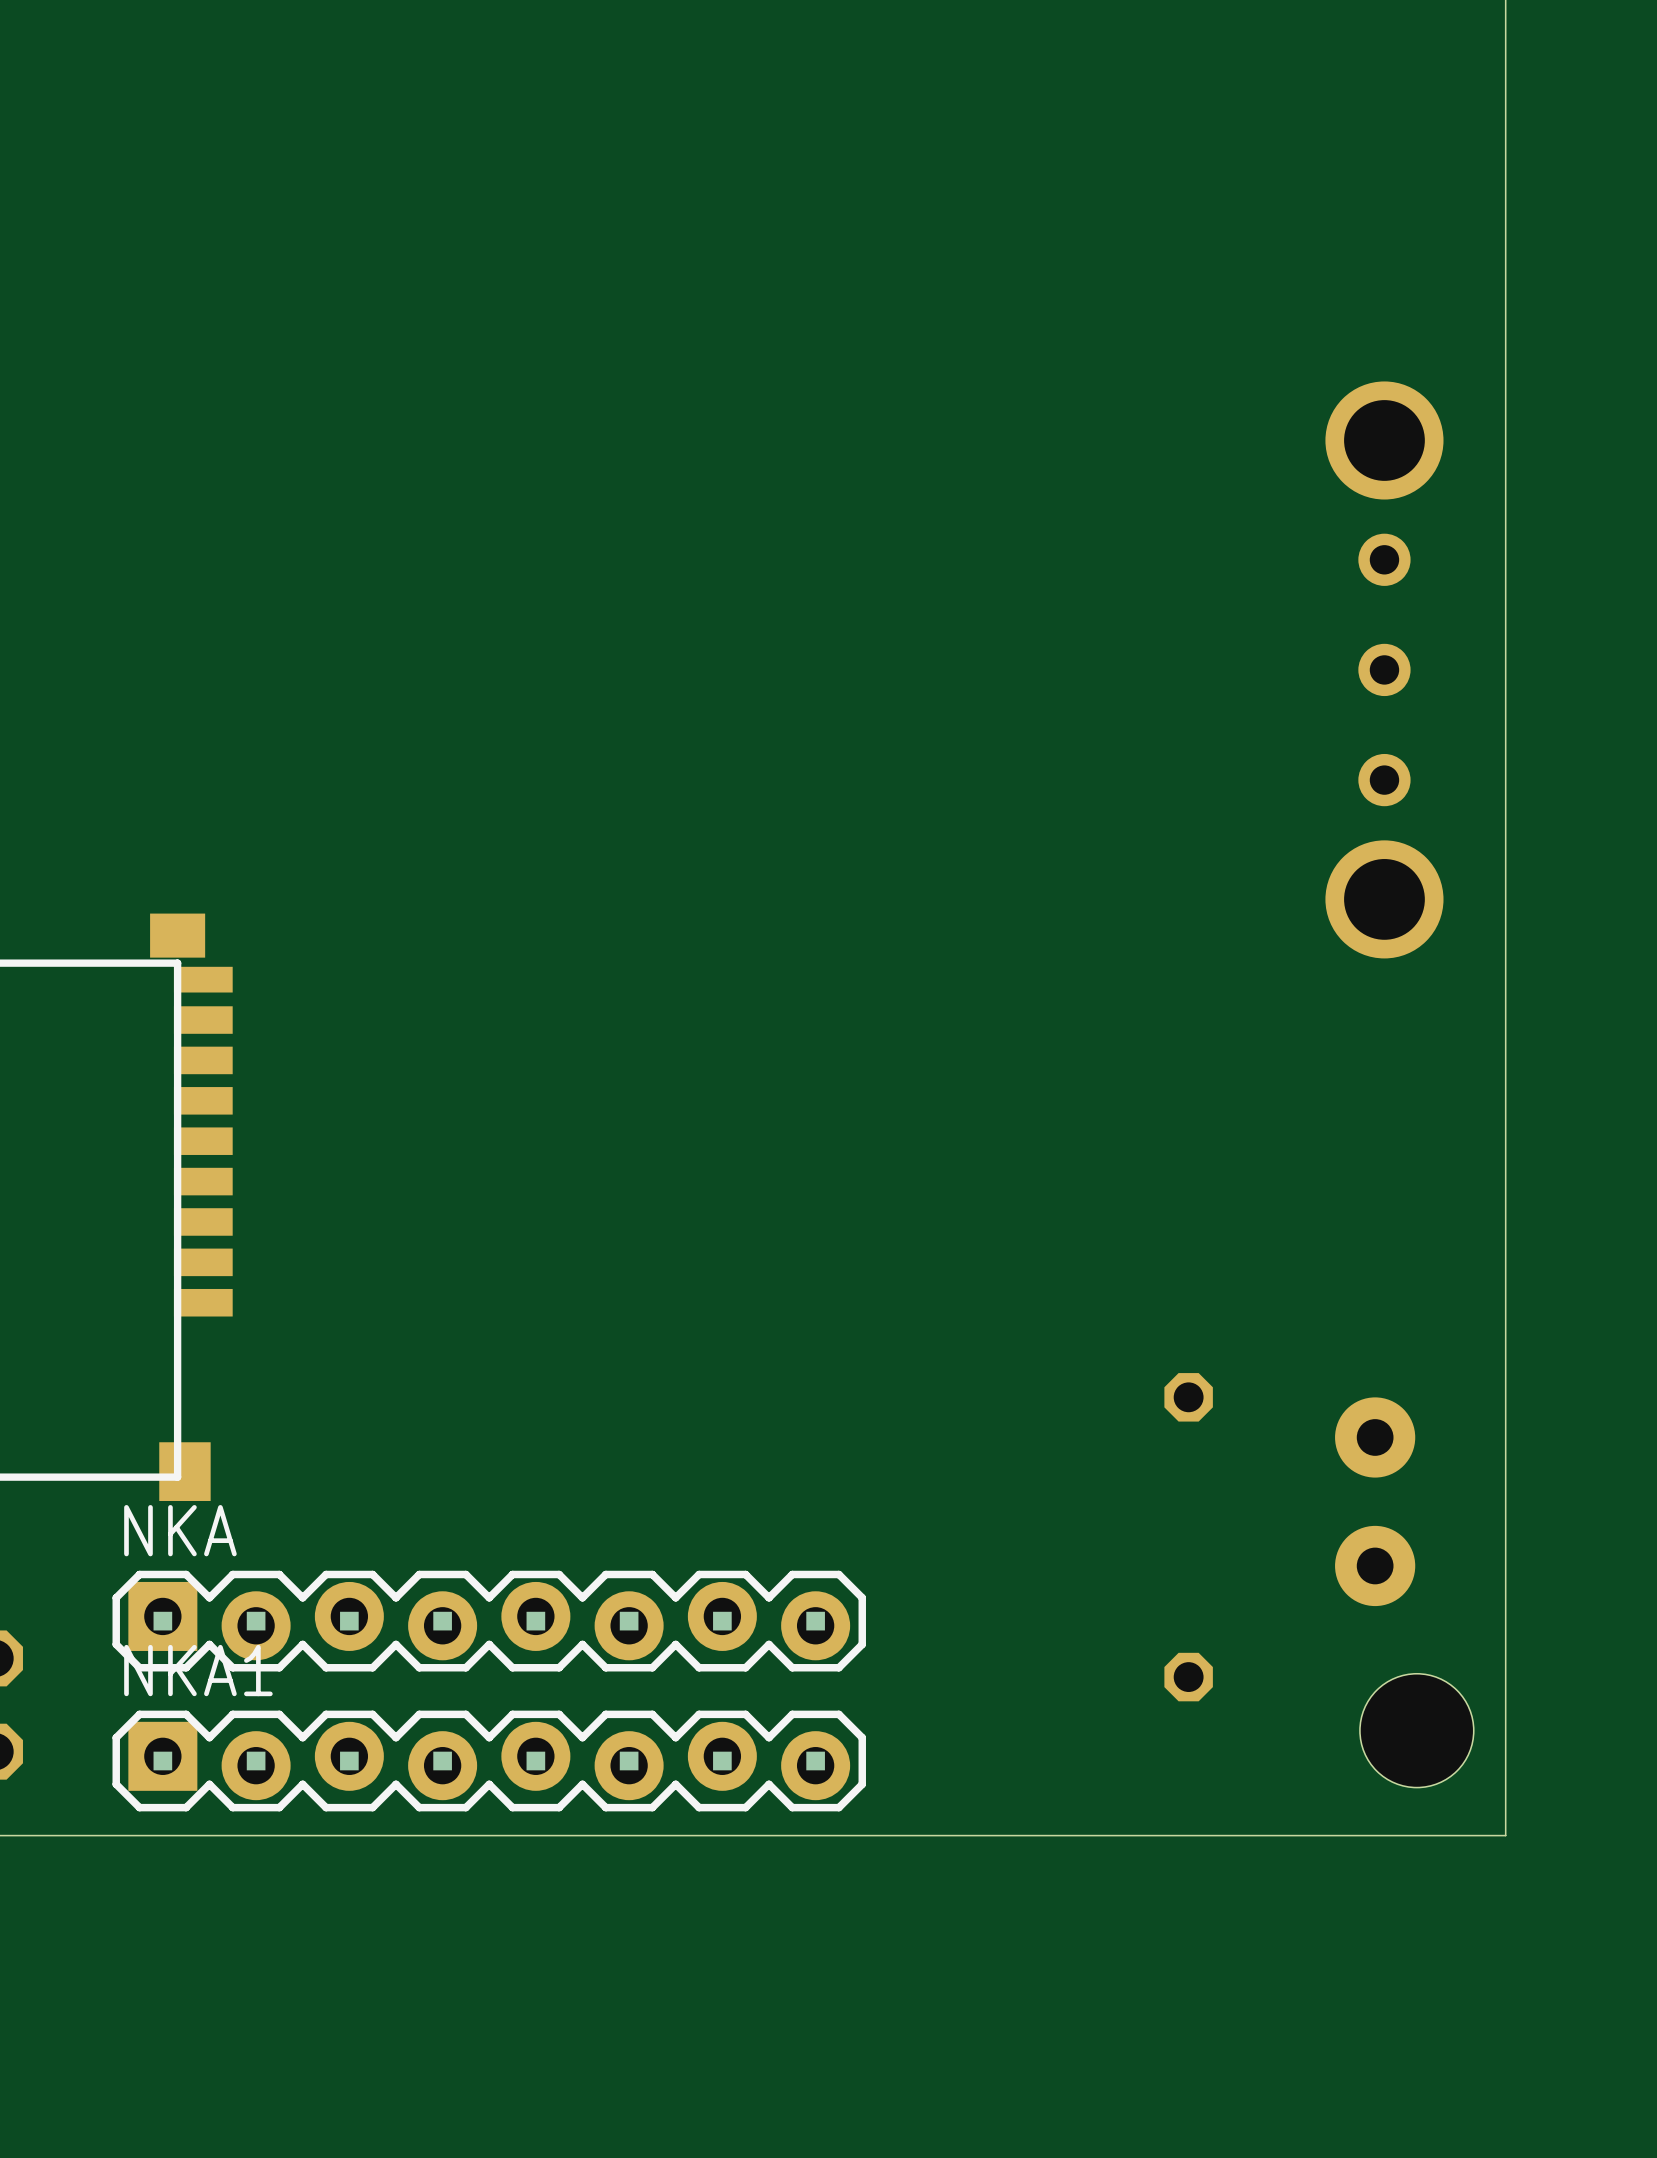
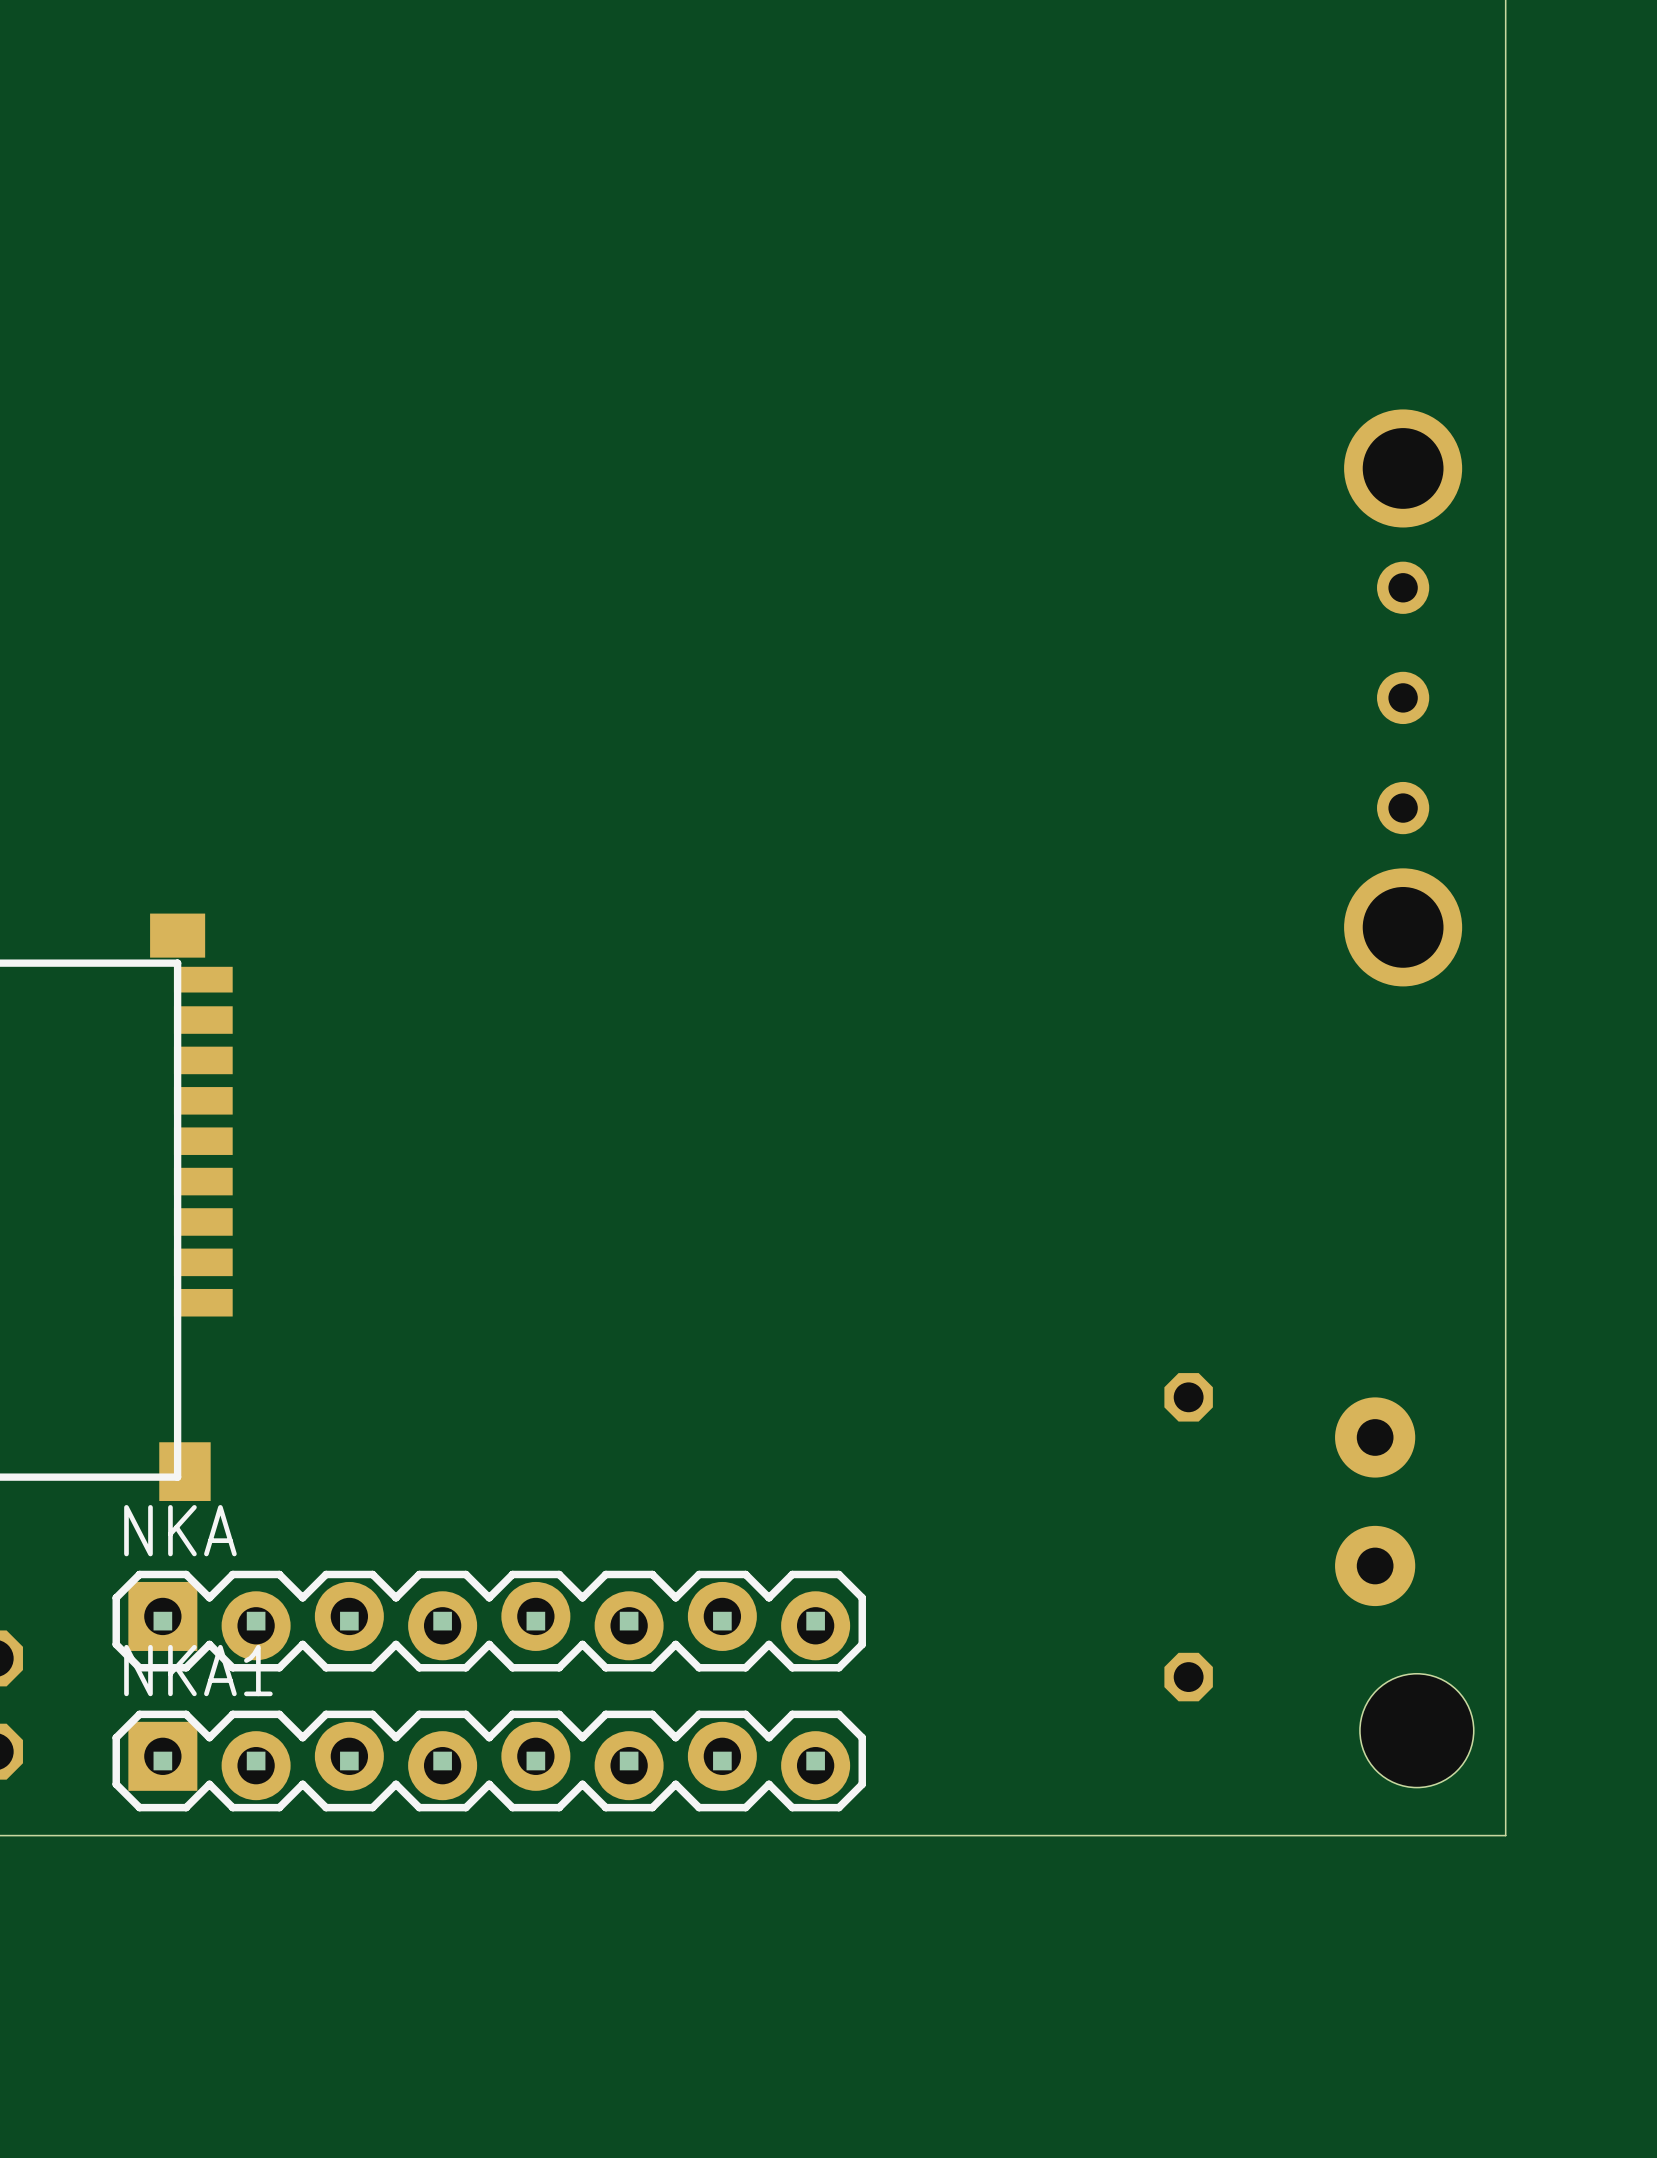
part position: (1384, 669) -> (1403, 697)

